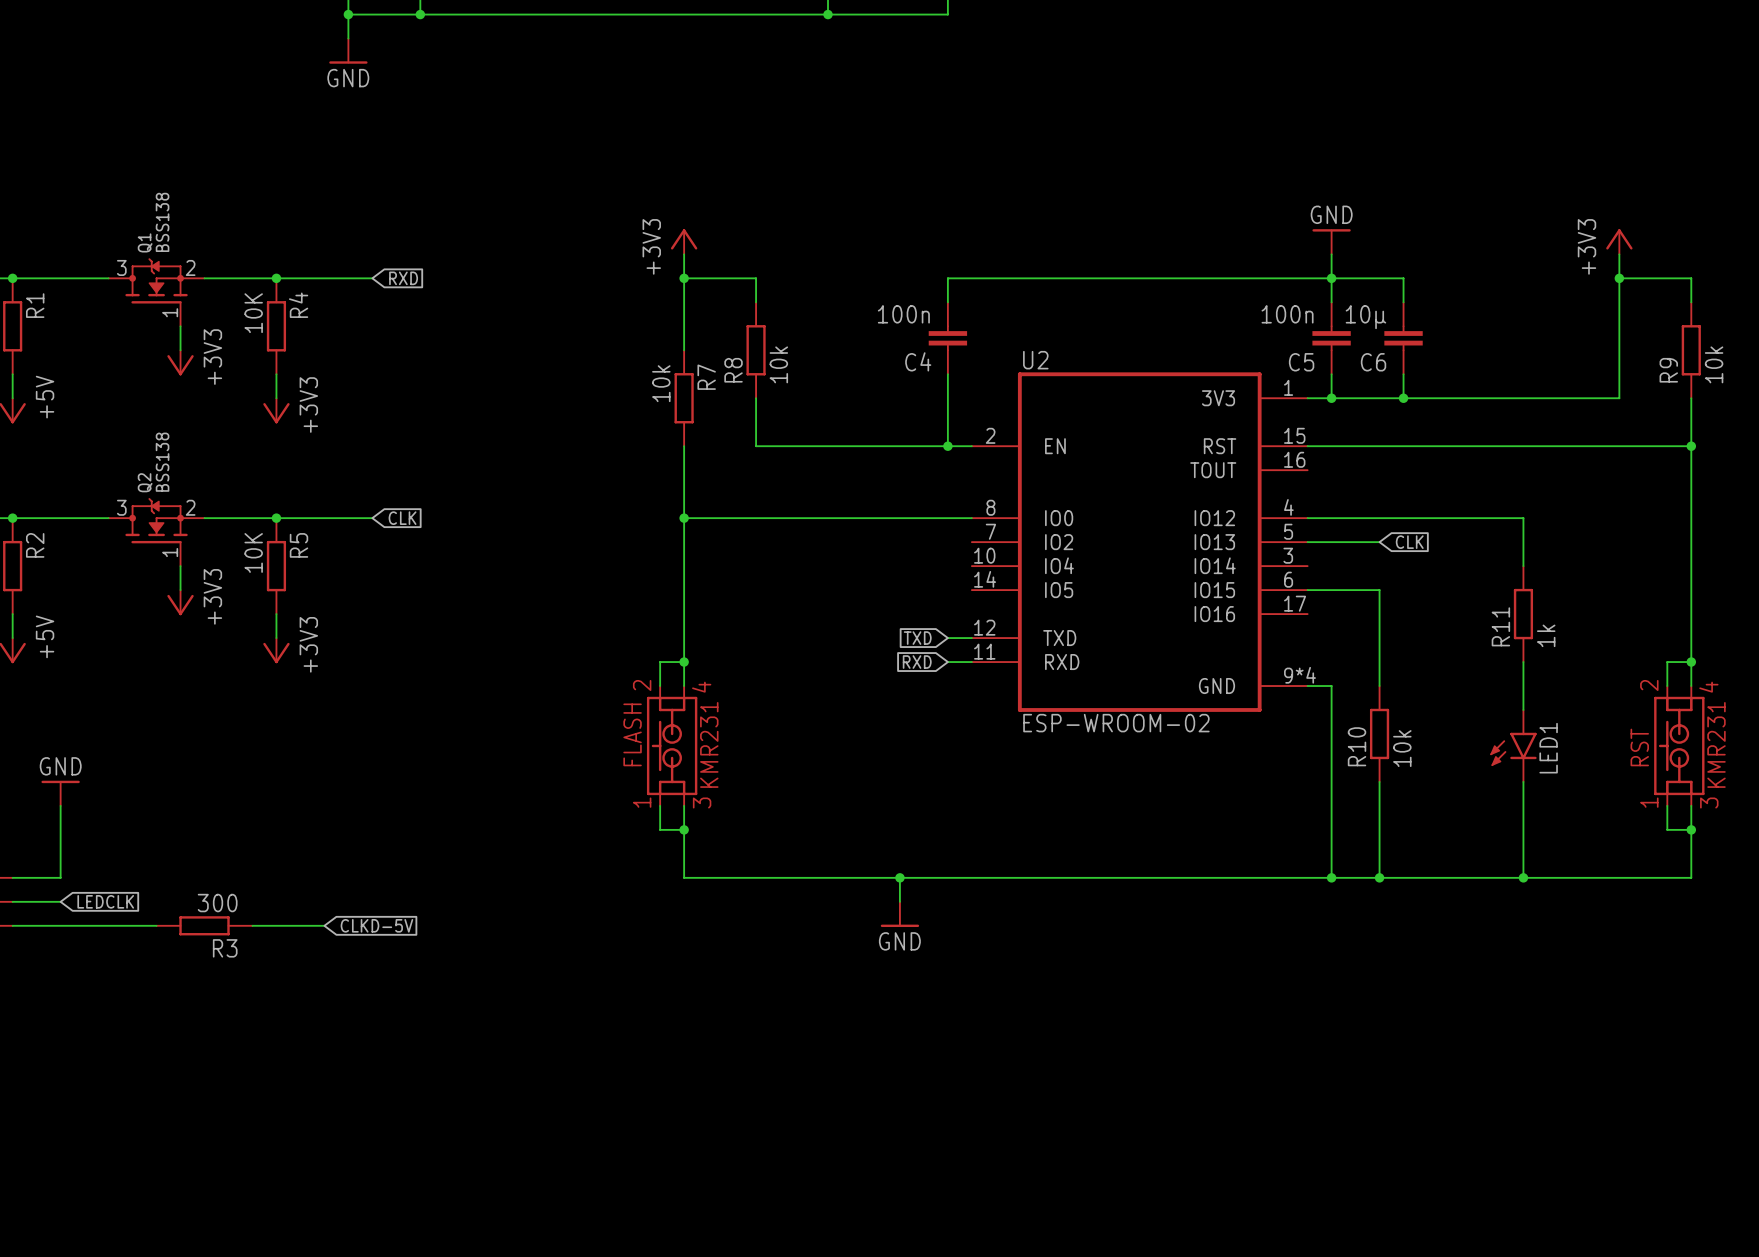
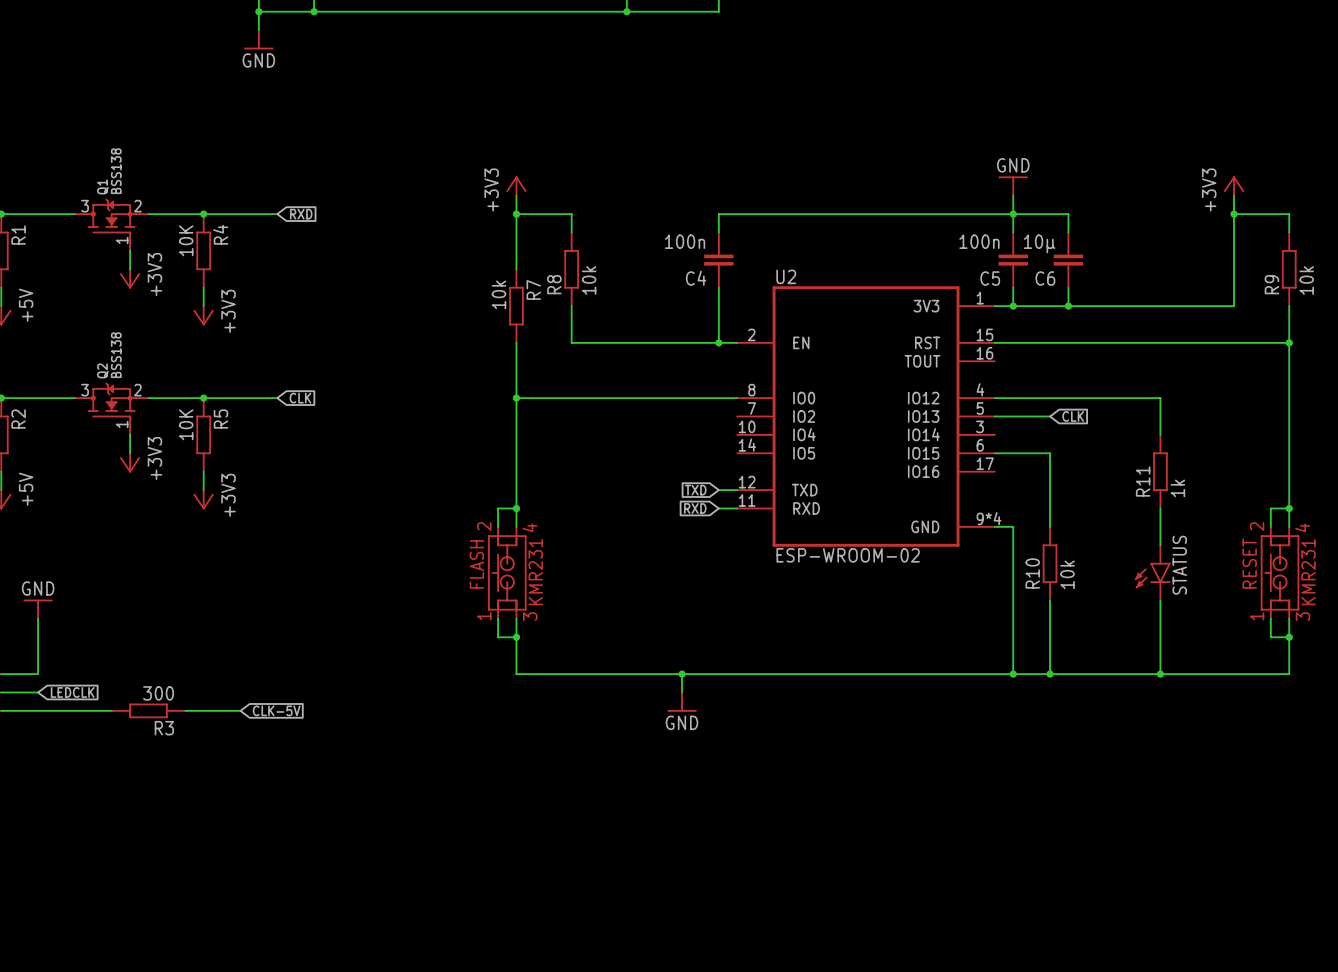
RST name: RST (1639, 747) -> RESET (1249, 563)
LED1 name: LED1 (1548, 748) -> STATUS (1179, 565)
global label: CLKD-5V (376, 925) -> CLK-5V (276, 710)

